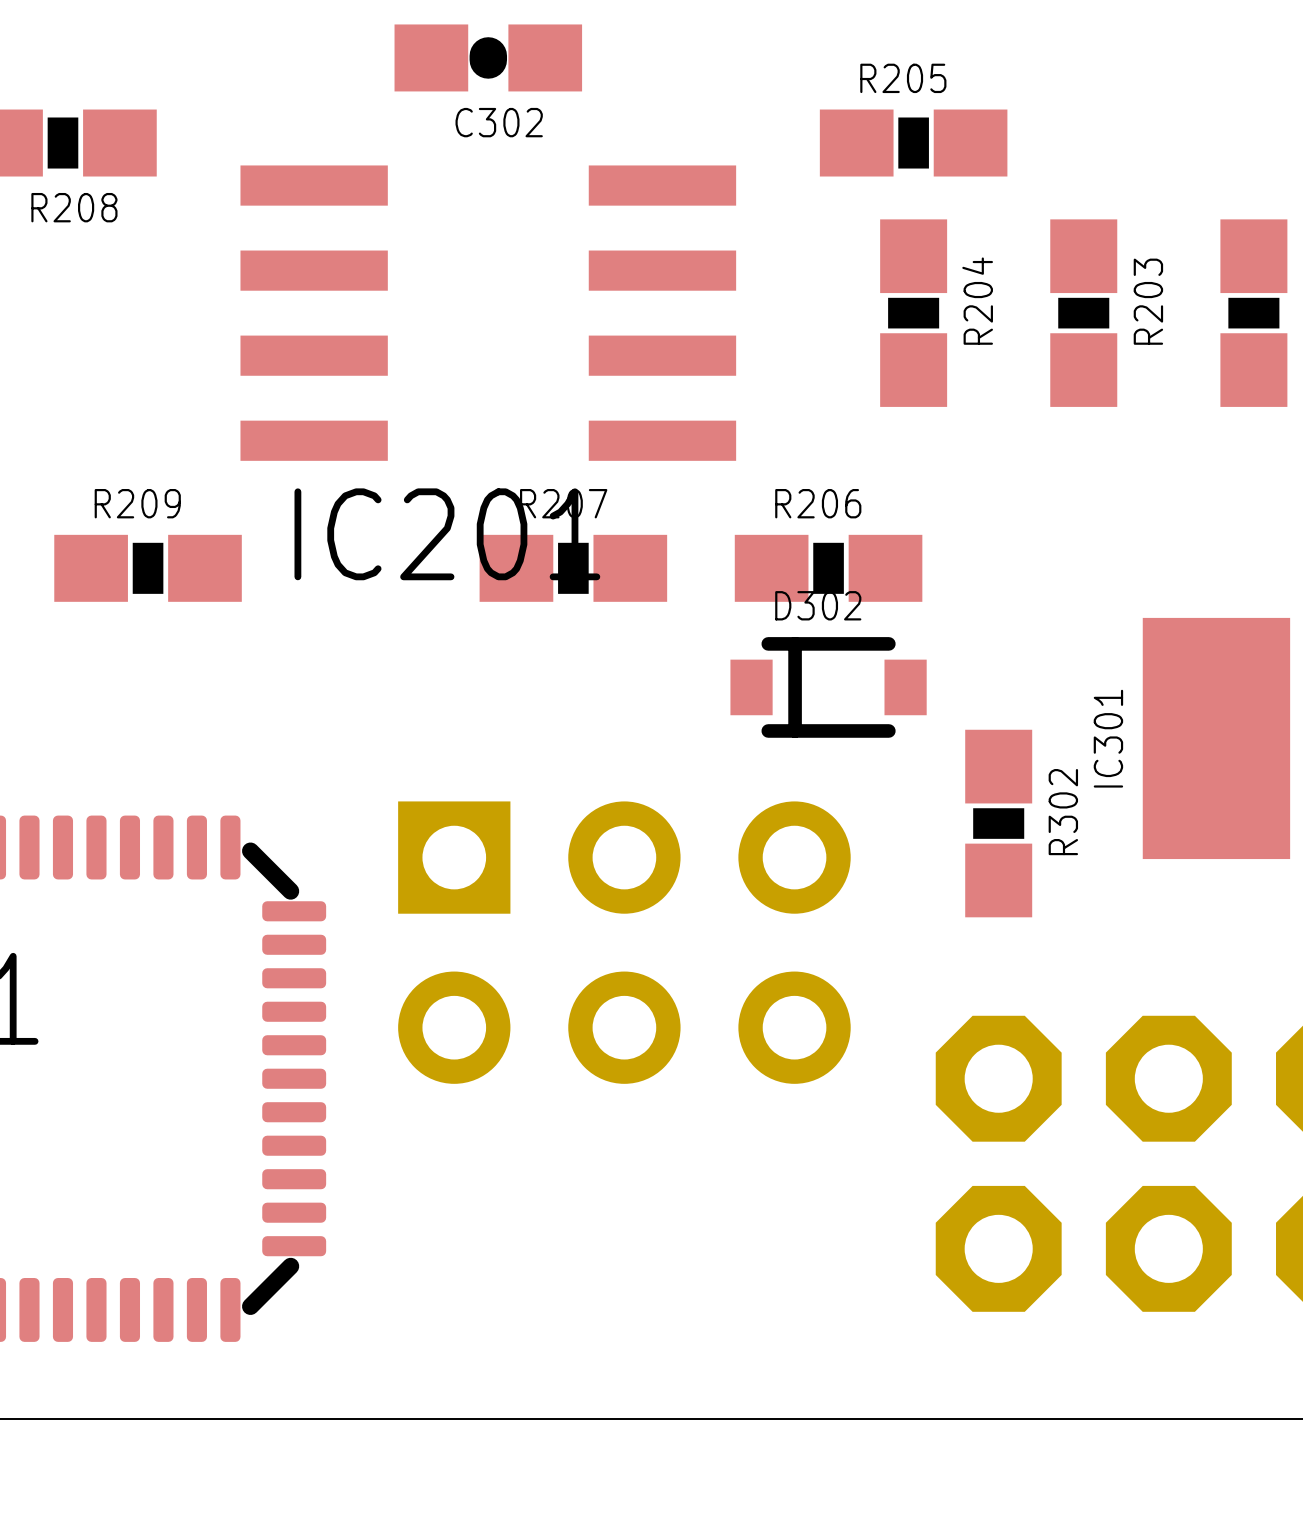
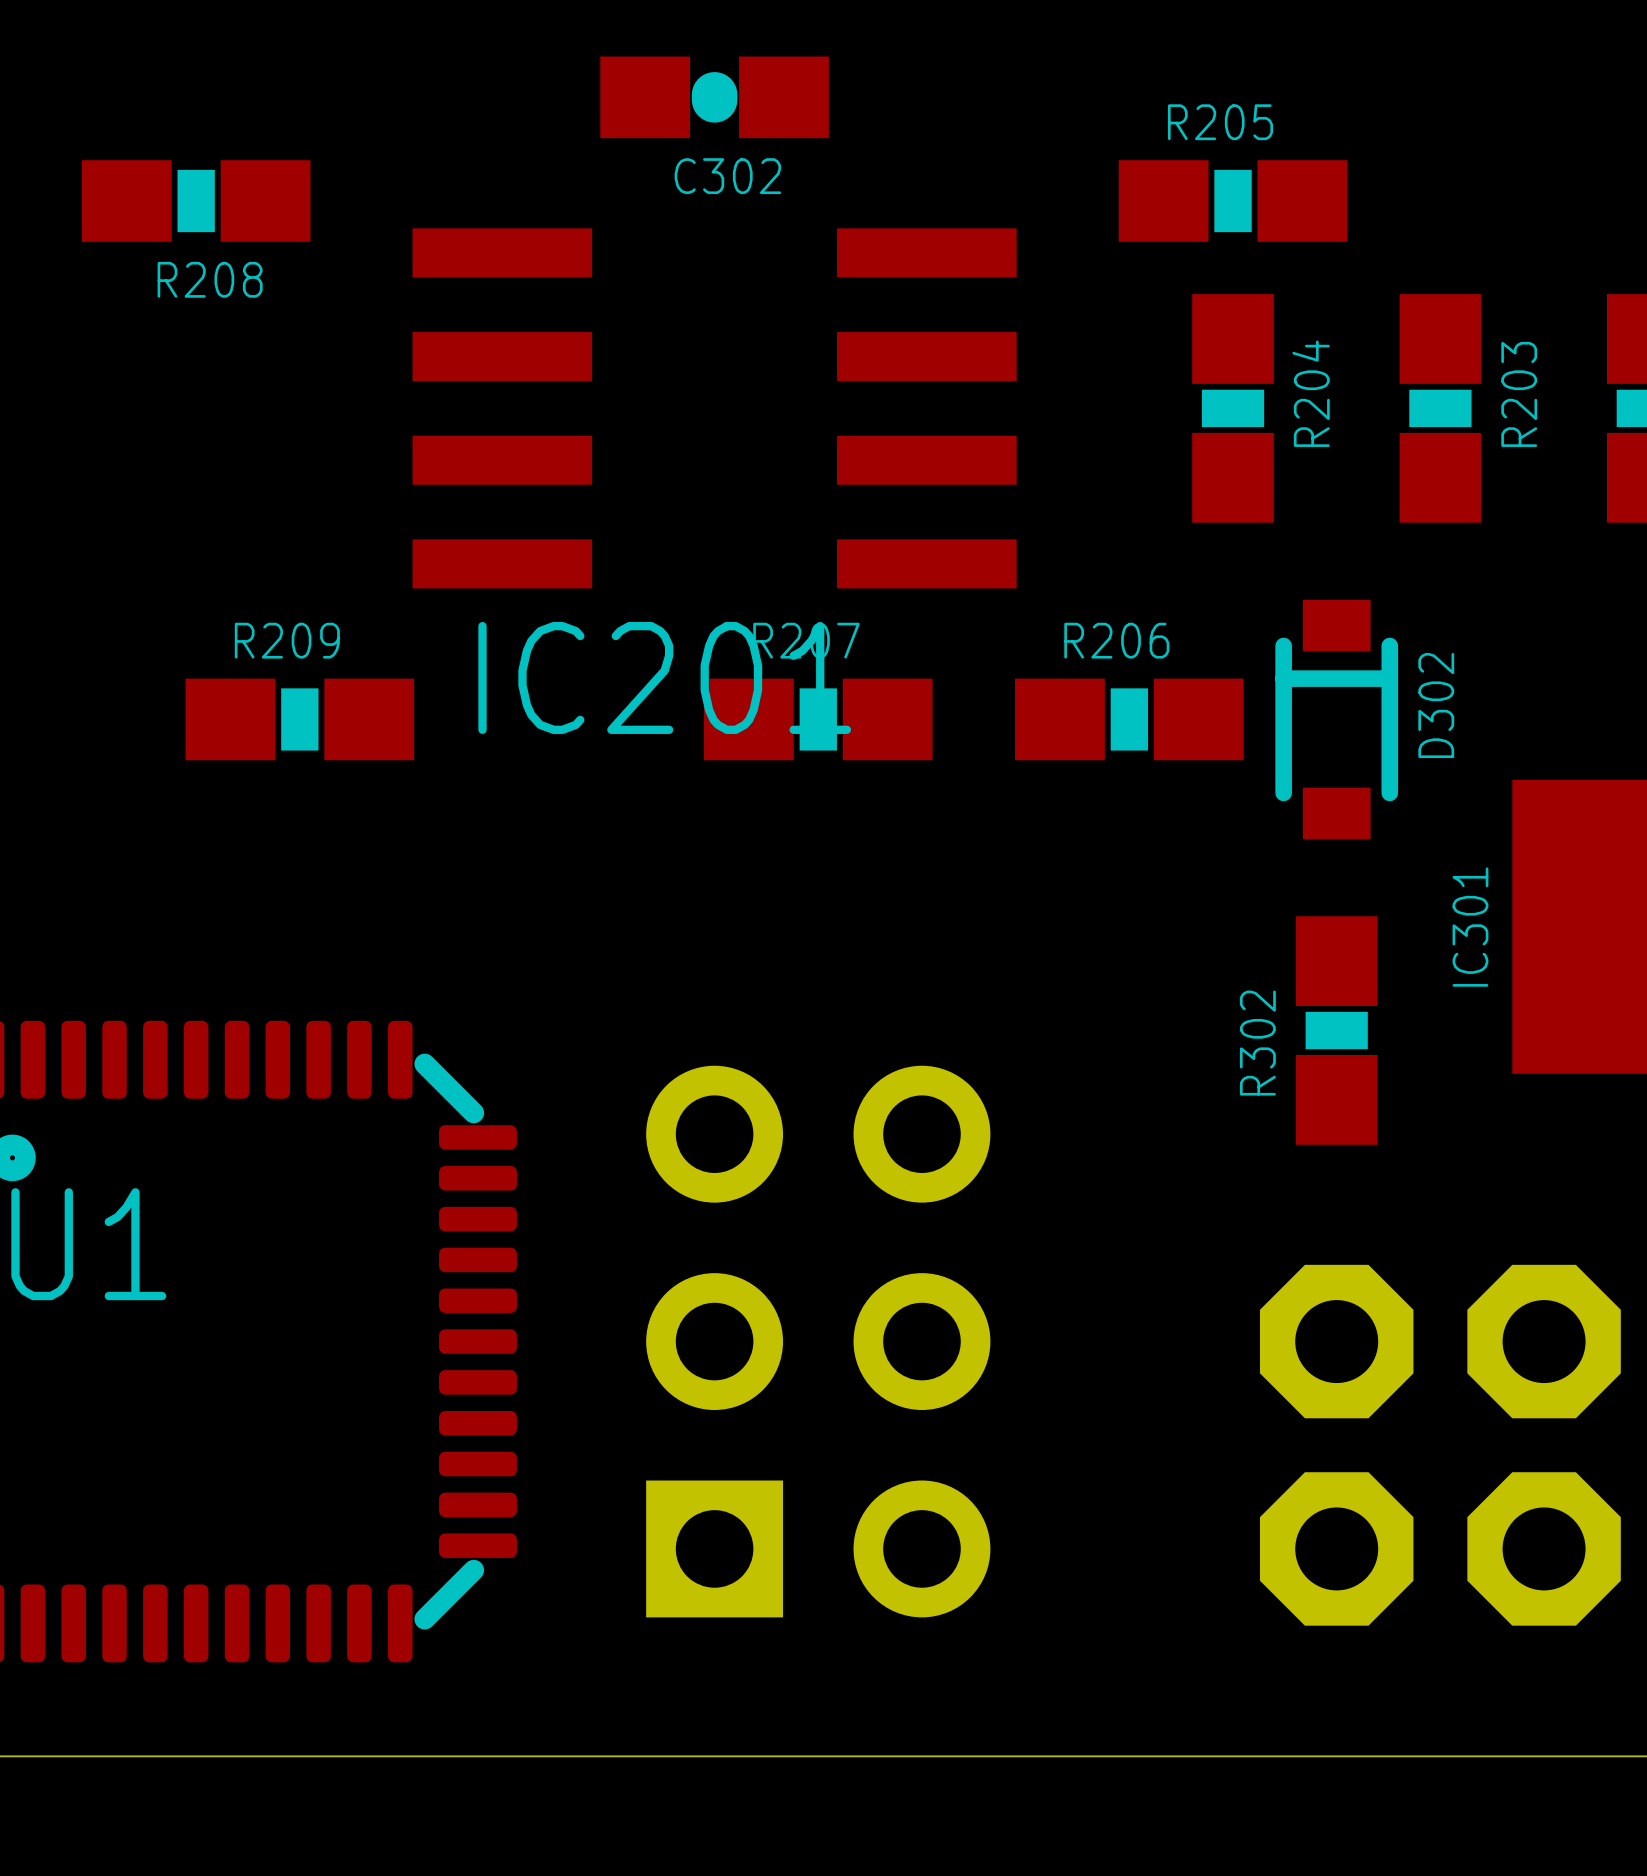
D302 rotation: 0° (828, 687) -> 90° clockwise (1336, 719)
D302 position: (828, 687) -> (1336, 719)
R302 name position: R302 (1063, 812) -> R302 (1257, 1043)
part rotation: 0° (624, 942) -> 90° counterclockwise (818, 1341)

